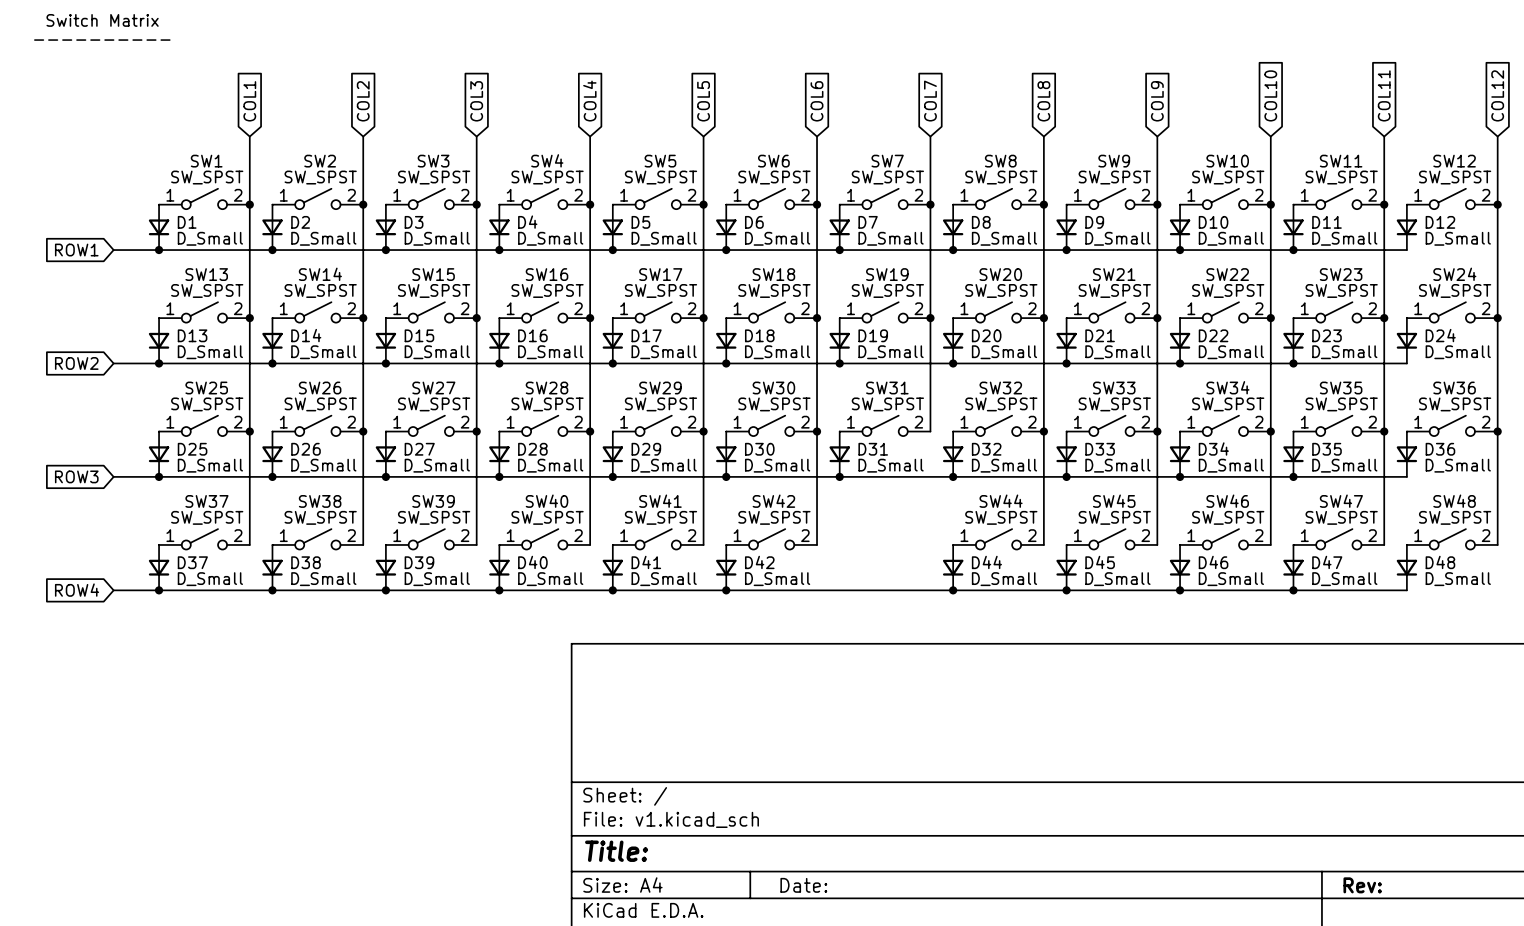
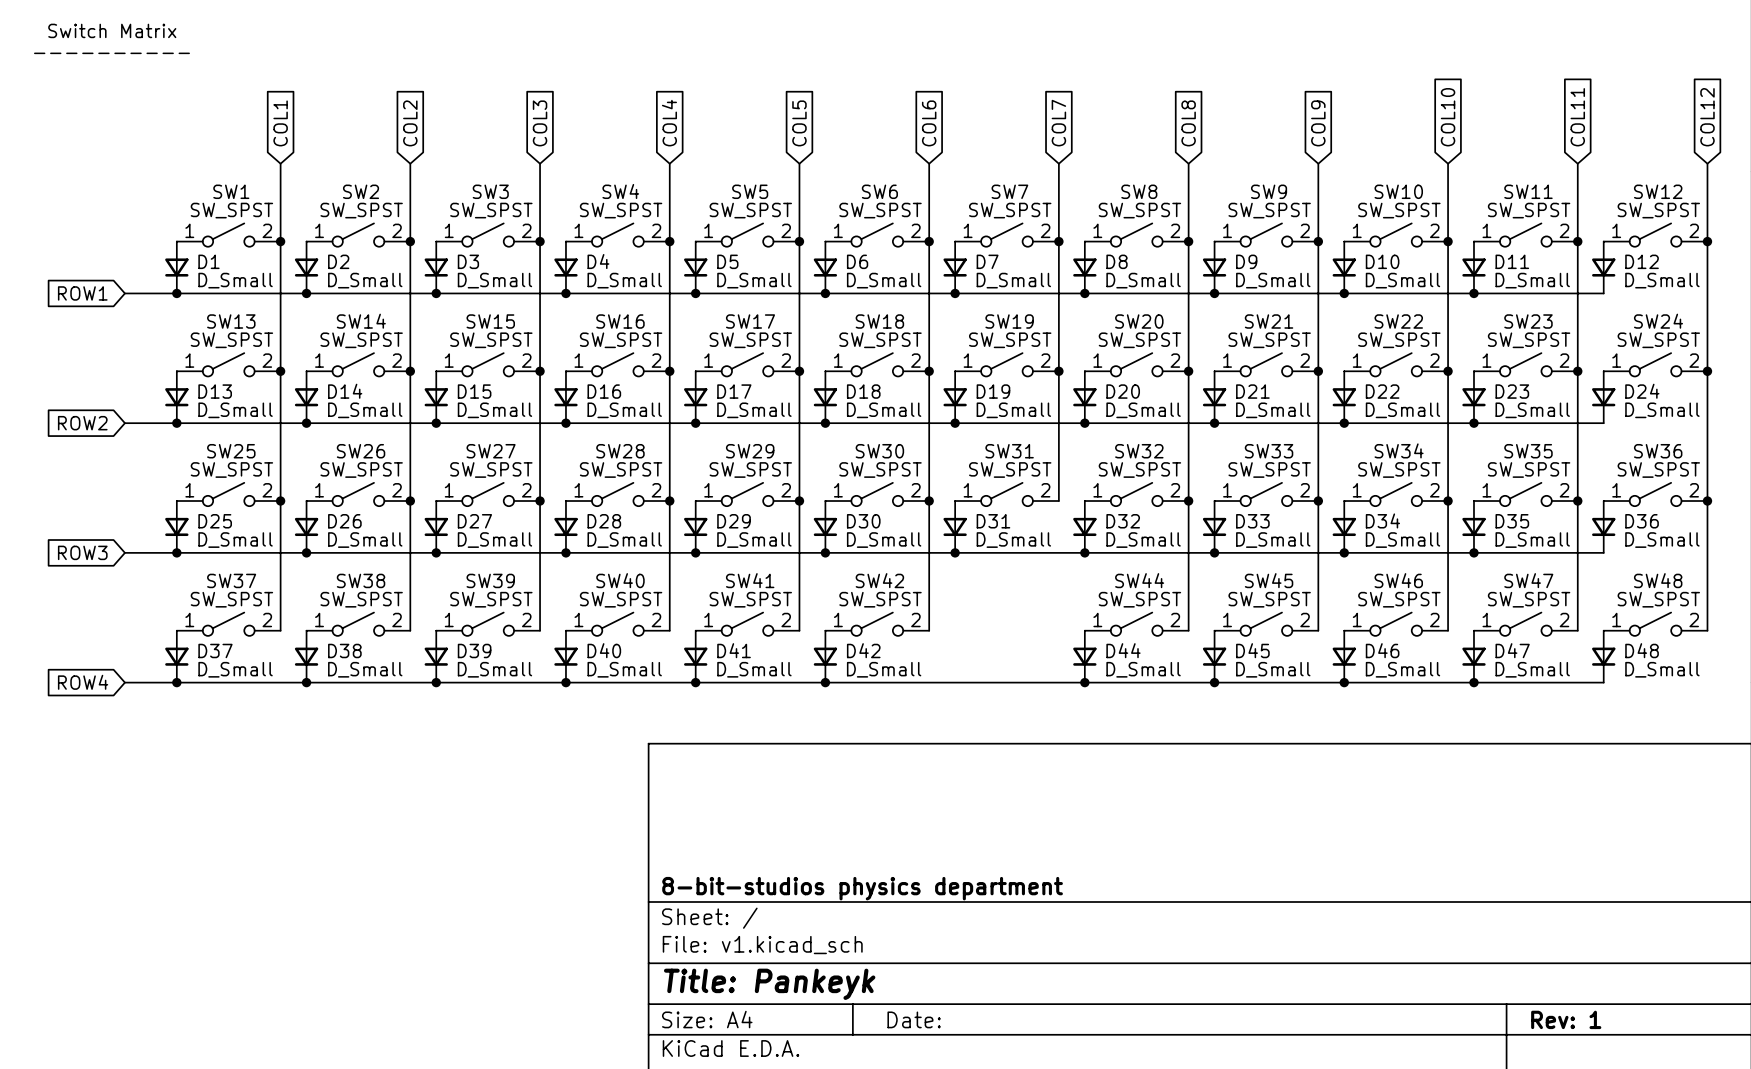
title block: none -> 8-bit-studios physics department (862, 888)
title block: Title: (616, 851) -> Title: Pankeyk (769, 984)
title block: Rev: (1362, 885) -> Rev: 1 (1566, 1019)

